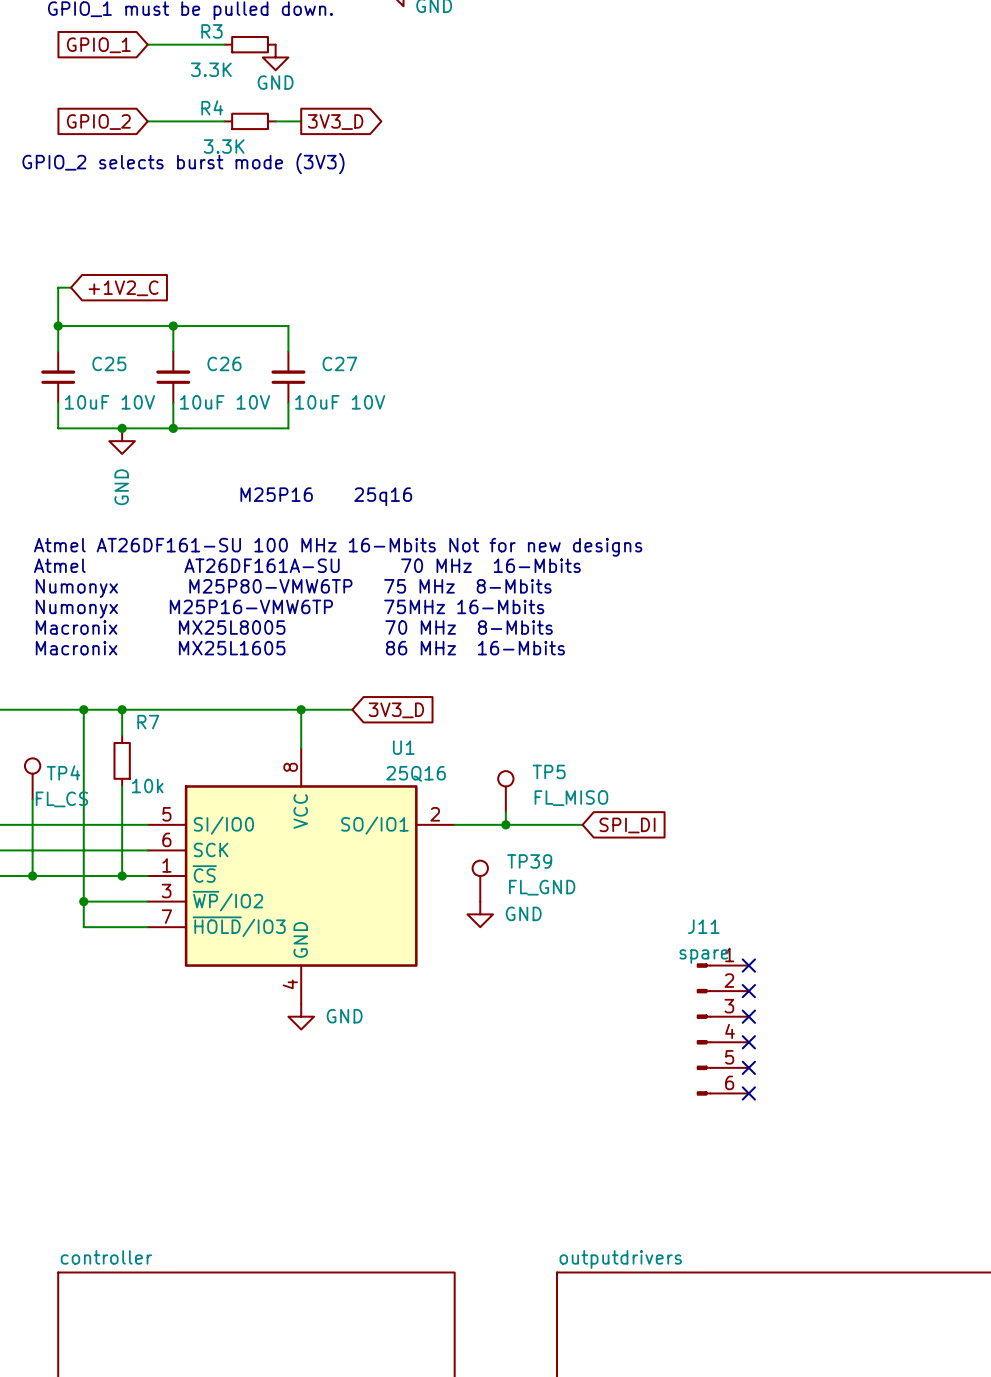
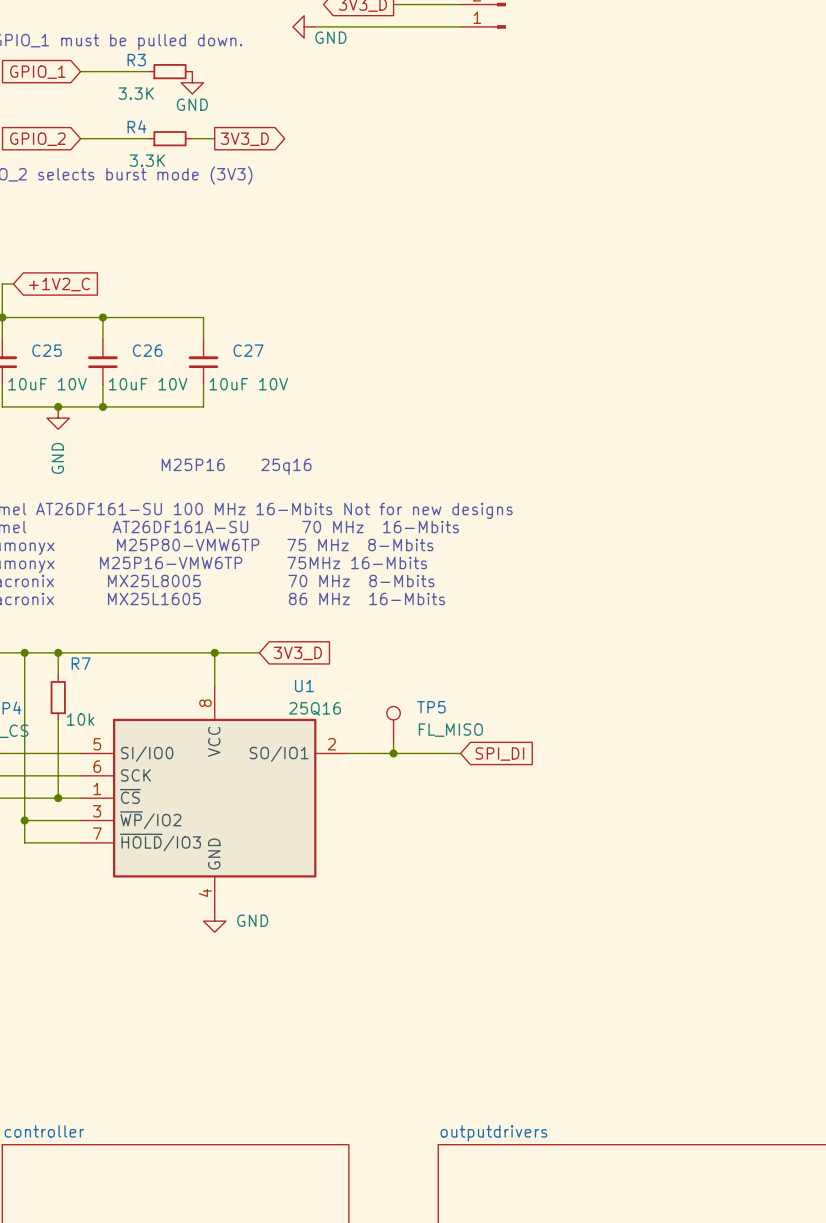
TP39: FL_GND (480, 881) -> none
power symbol: GND (480, 914) -> none
no-connect mark: (748, 965) -> none
no-connect mark: (748, 991) -> none
no-connect mark: (748, 1016) -> none
J11: spare (722, 1029) -> none
no-connect mark: (748, 1042) -> none
no-connect mark: (748, 1067) -> none
no-connect mark: (748, 1093) -> none

